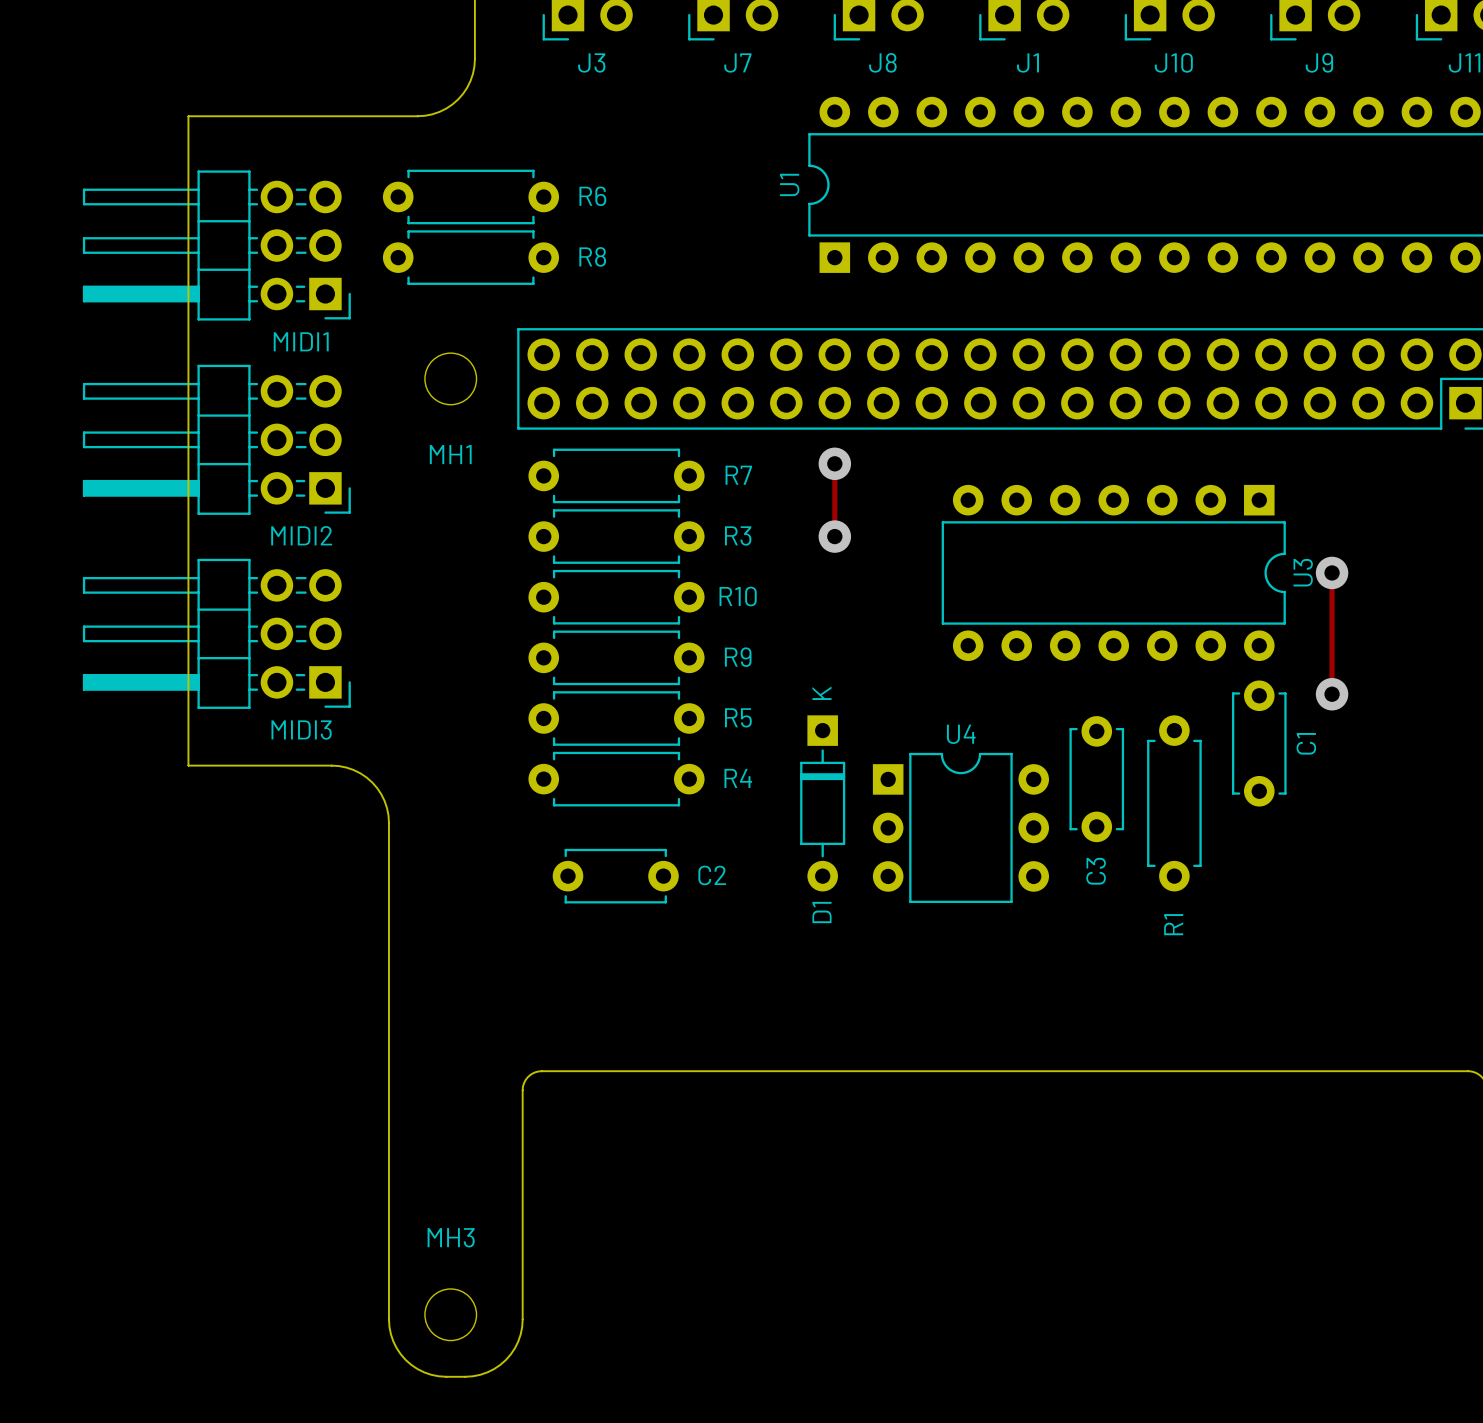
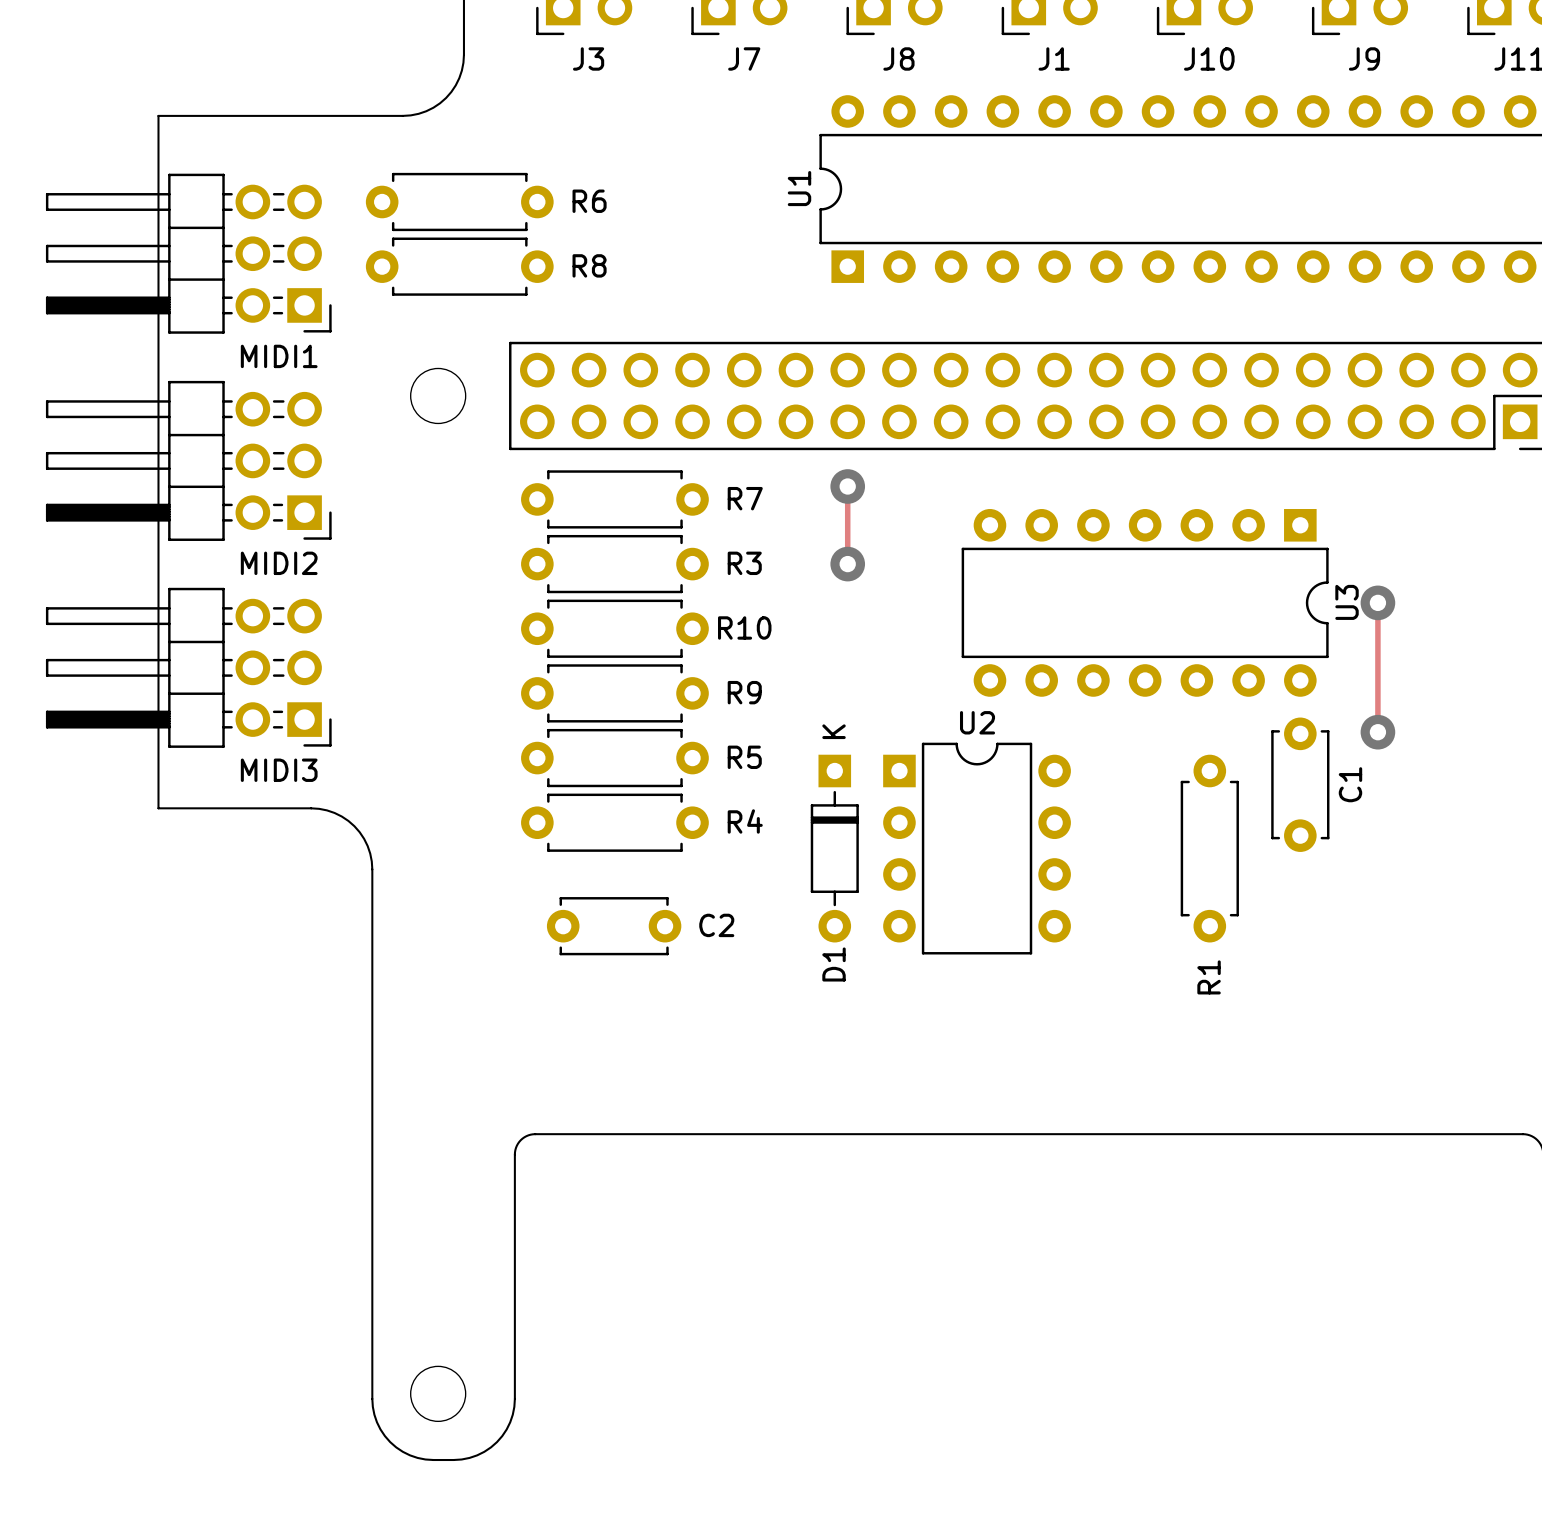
MH1 name: MH1 (450, 454) -> none
C3: (1096, 779) -> none
U2: none -> (977, 848)
U4: (960, 827) -> none
MH3 name: MH3 (451, 1237) -> none

